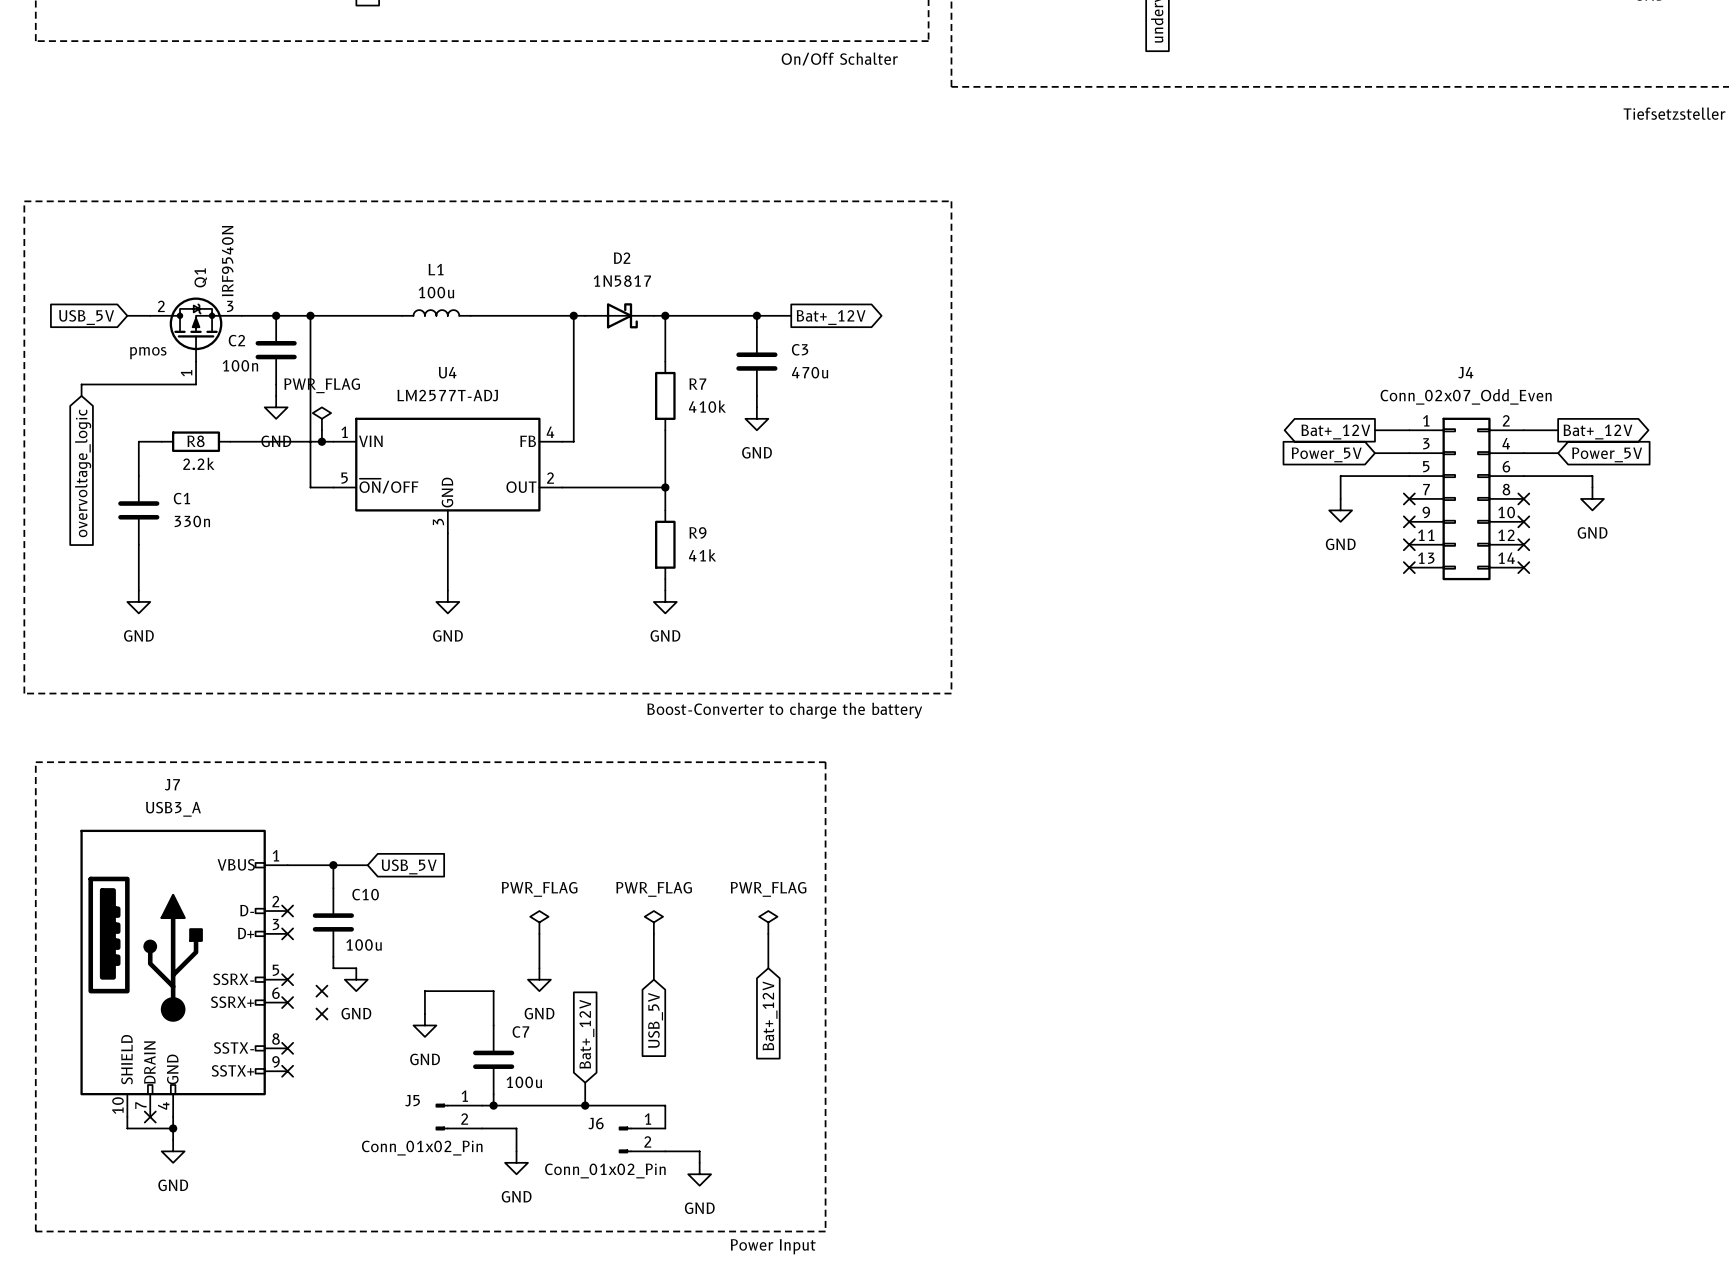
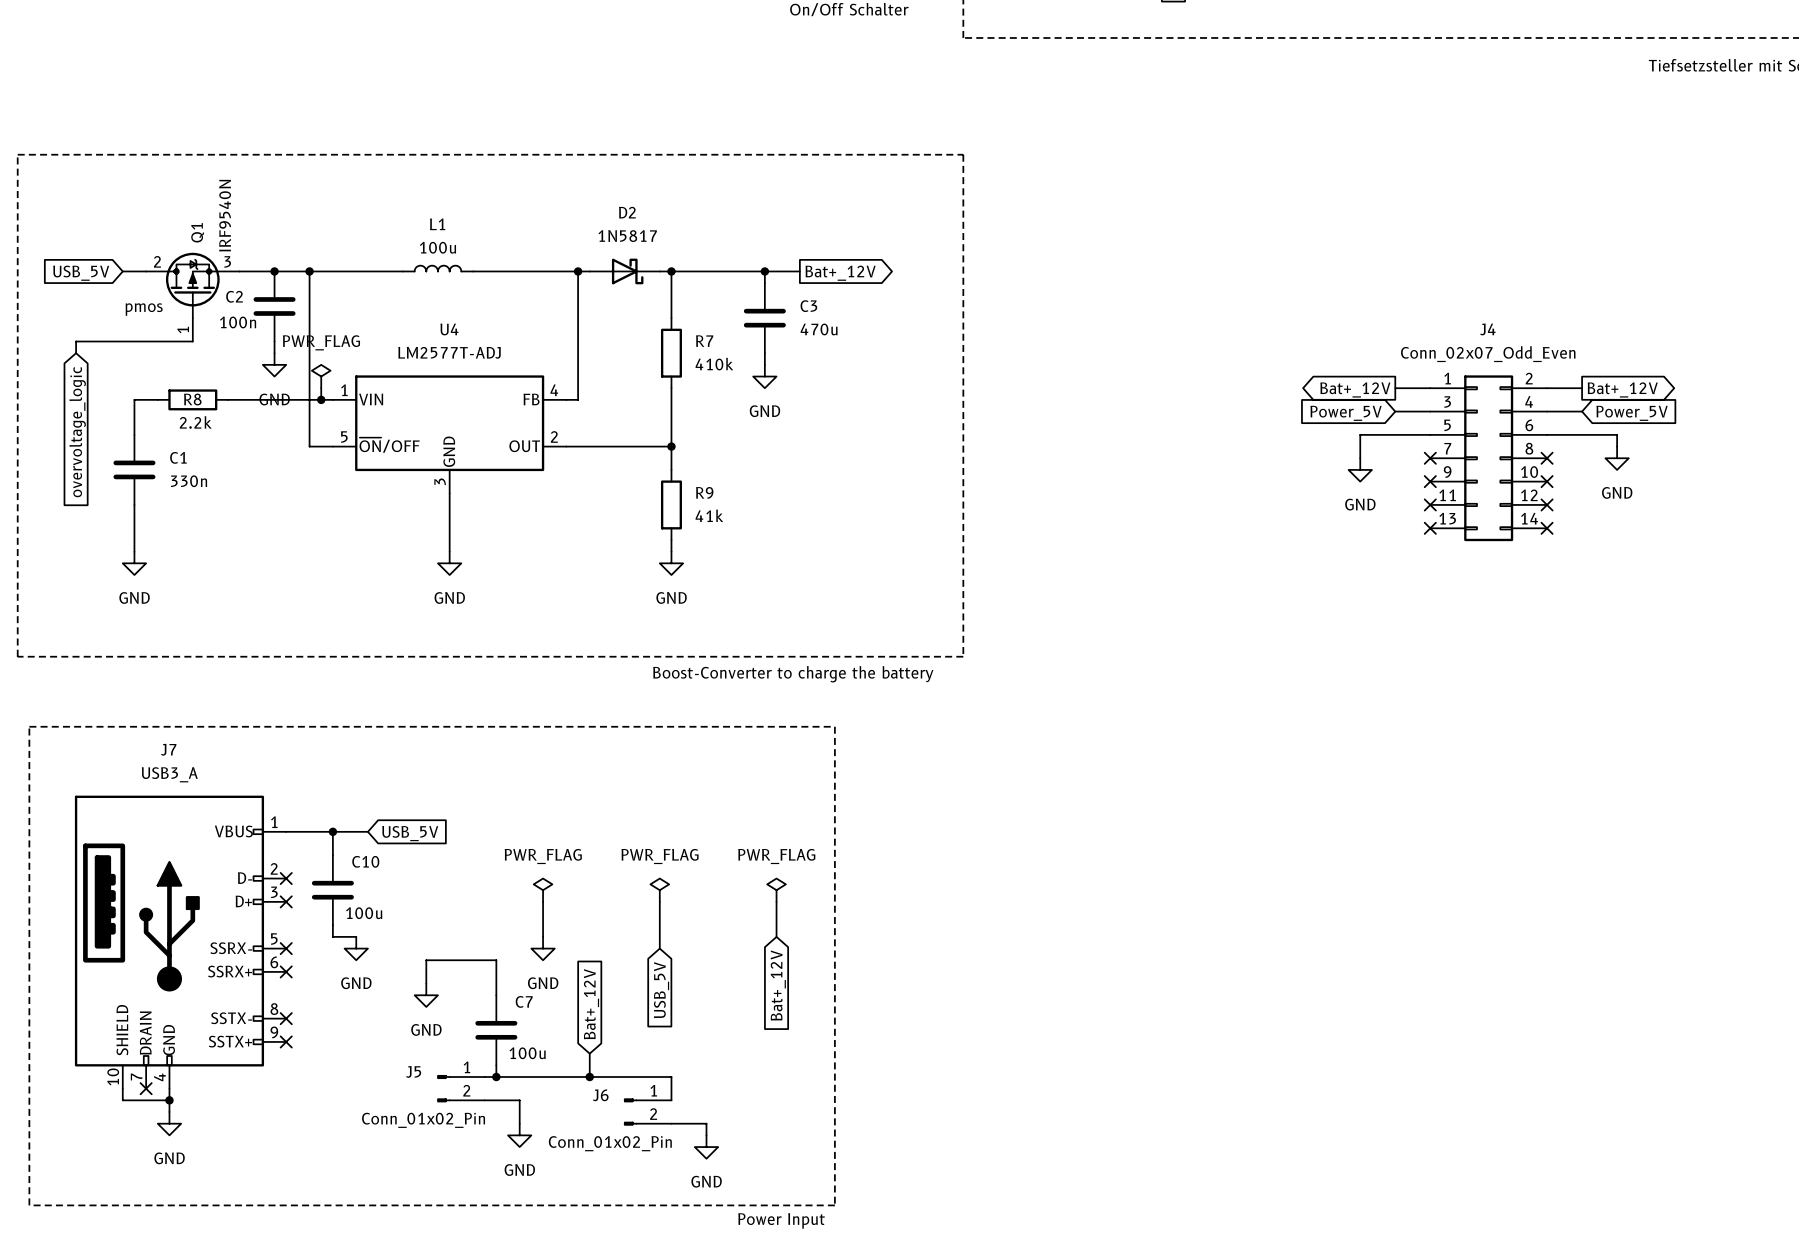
no-connect mark: (321, 991) -> none
no-connect mark: (321, 1014) -> none

